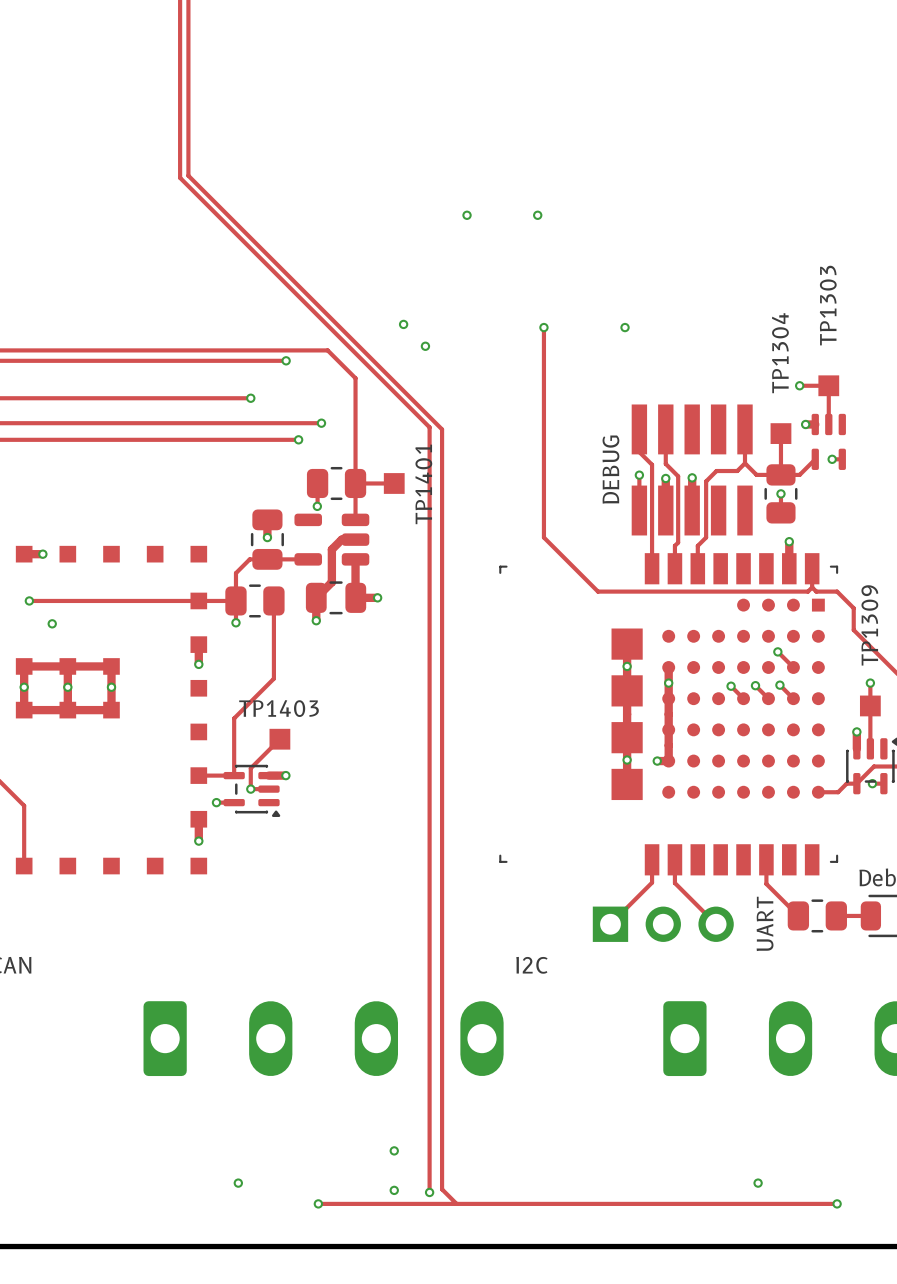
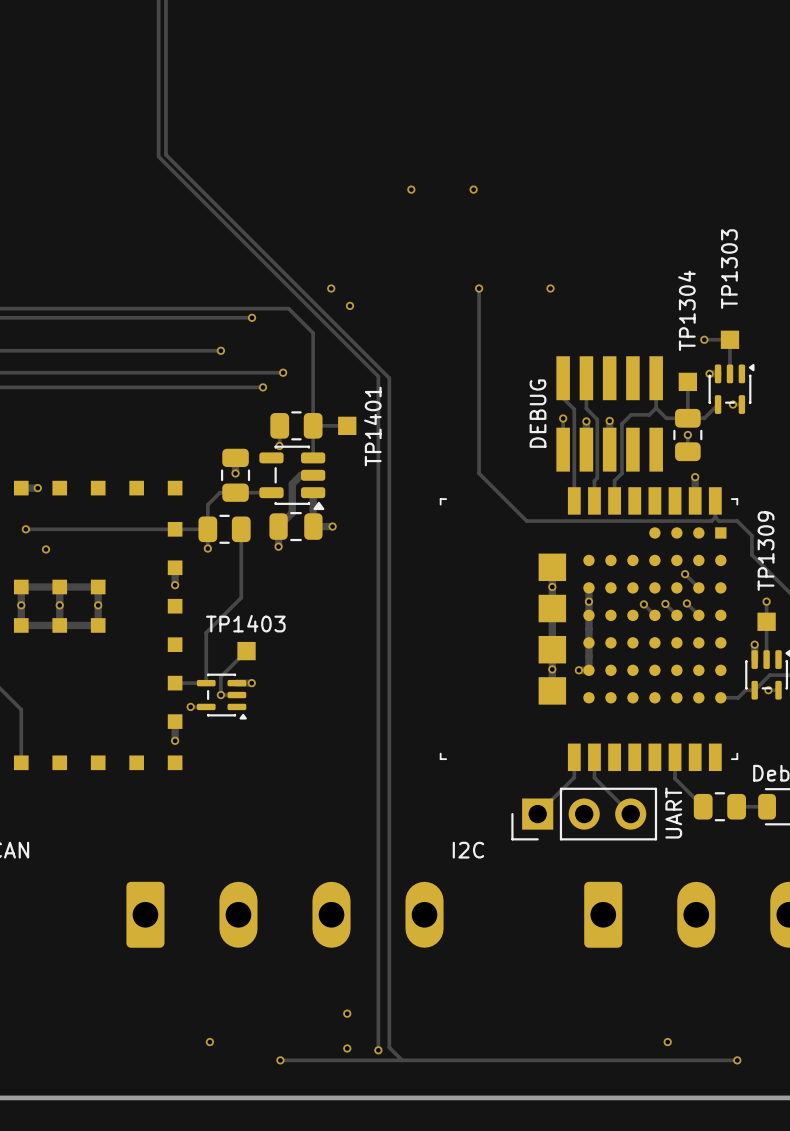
via: (403, 324) -> none
via: none -> (331, 288)
via: (425, 346) -> none
via: none -> (349, 305)
part footprint: [811, 413, 846, 470] -> [708, 363, 755, 414]
part footprint: [294, 513, 370, 566] -> [259, 445, 326, 511]
part footprint: [592, 906, 734, 942] -> [511, 787, 658, 841]

